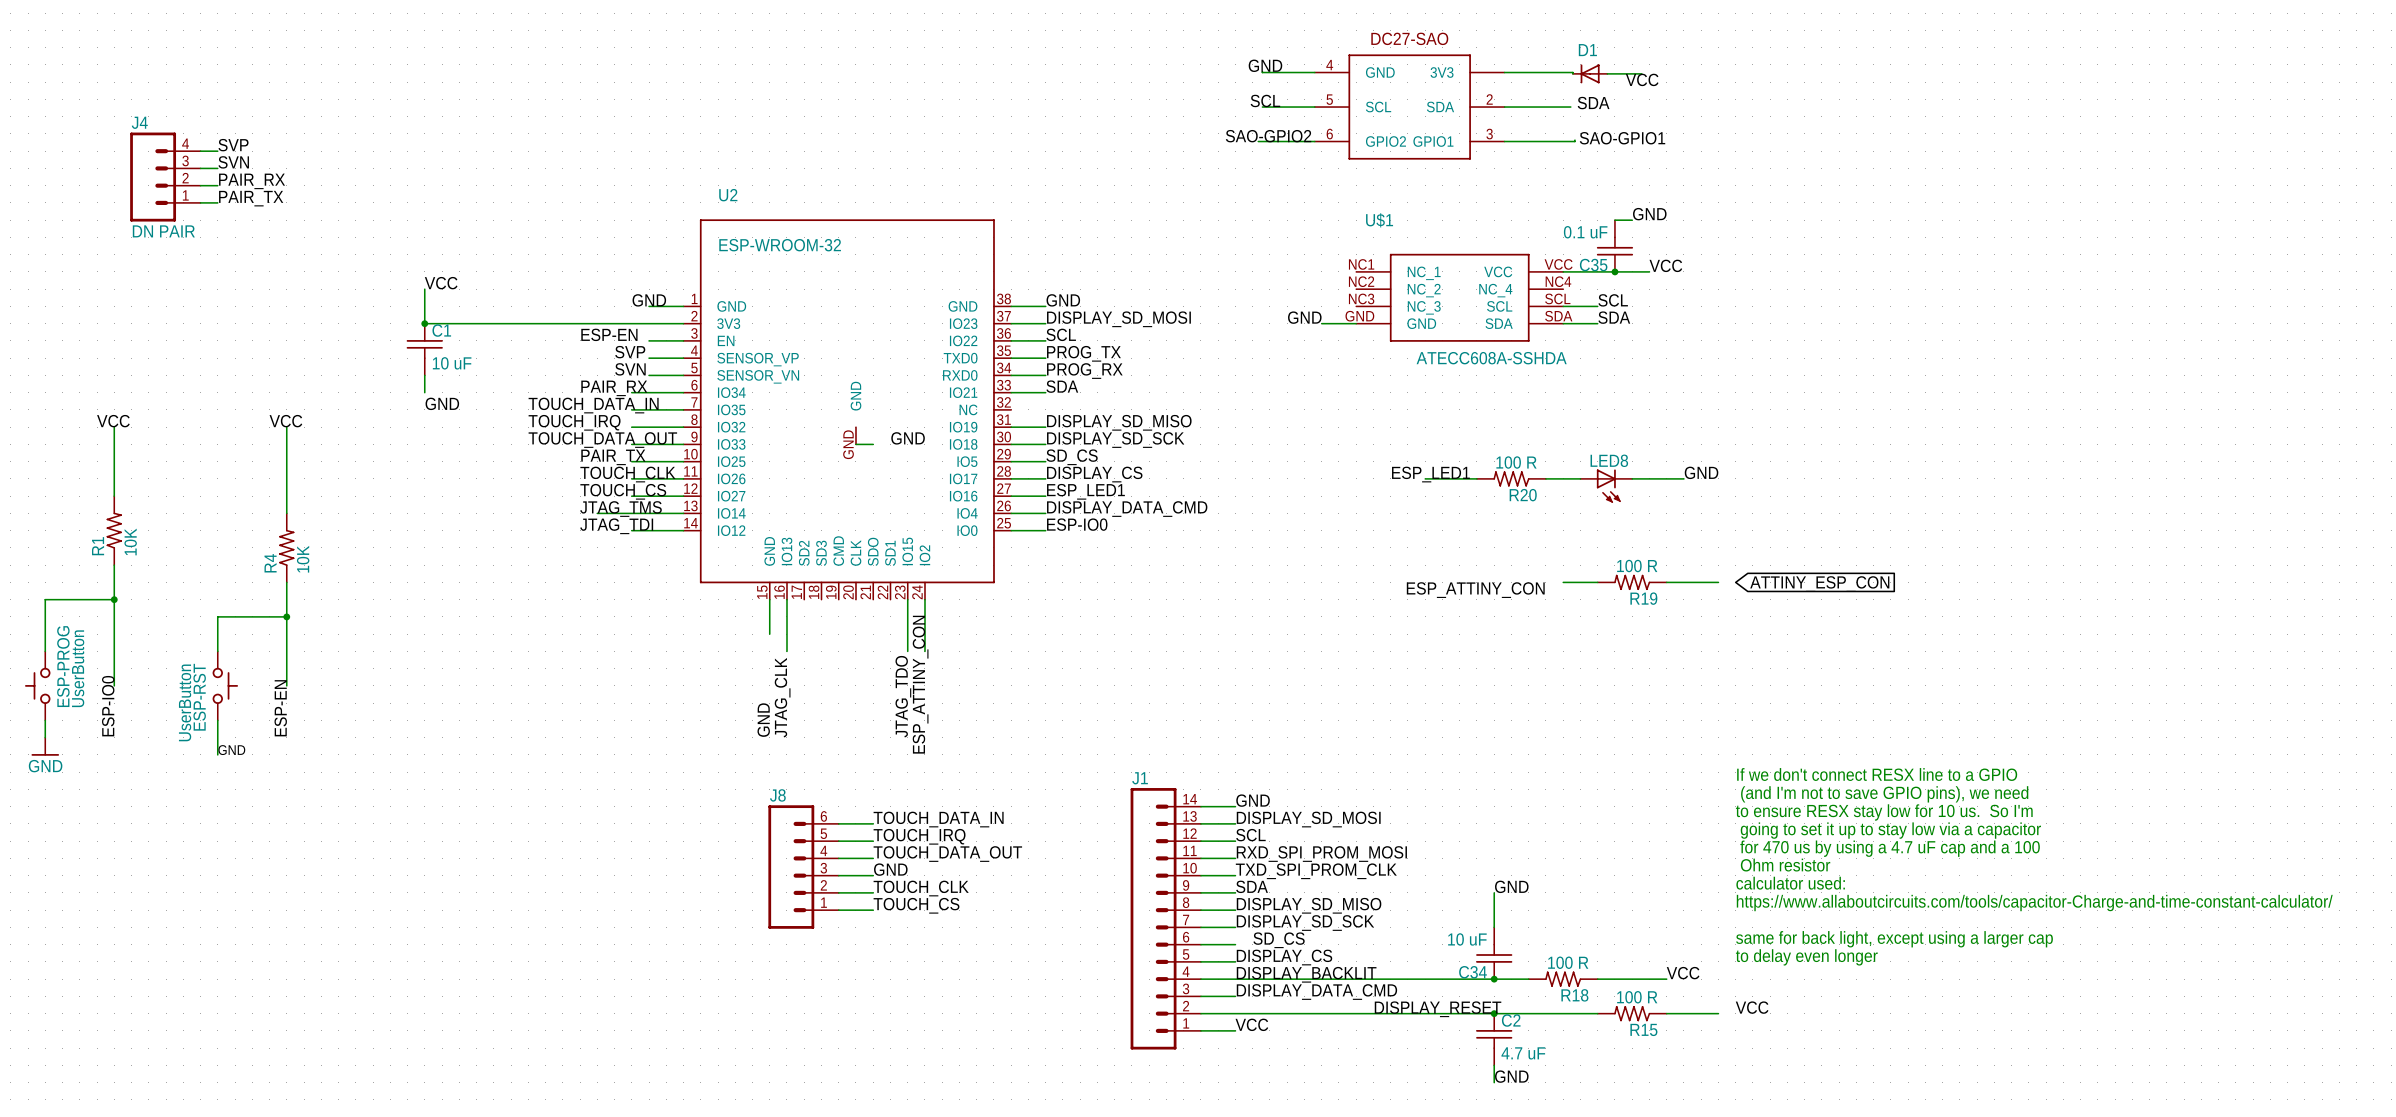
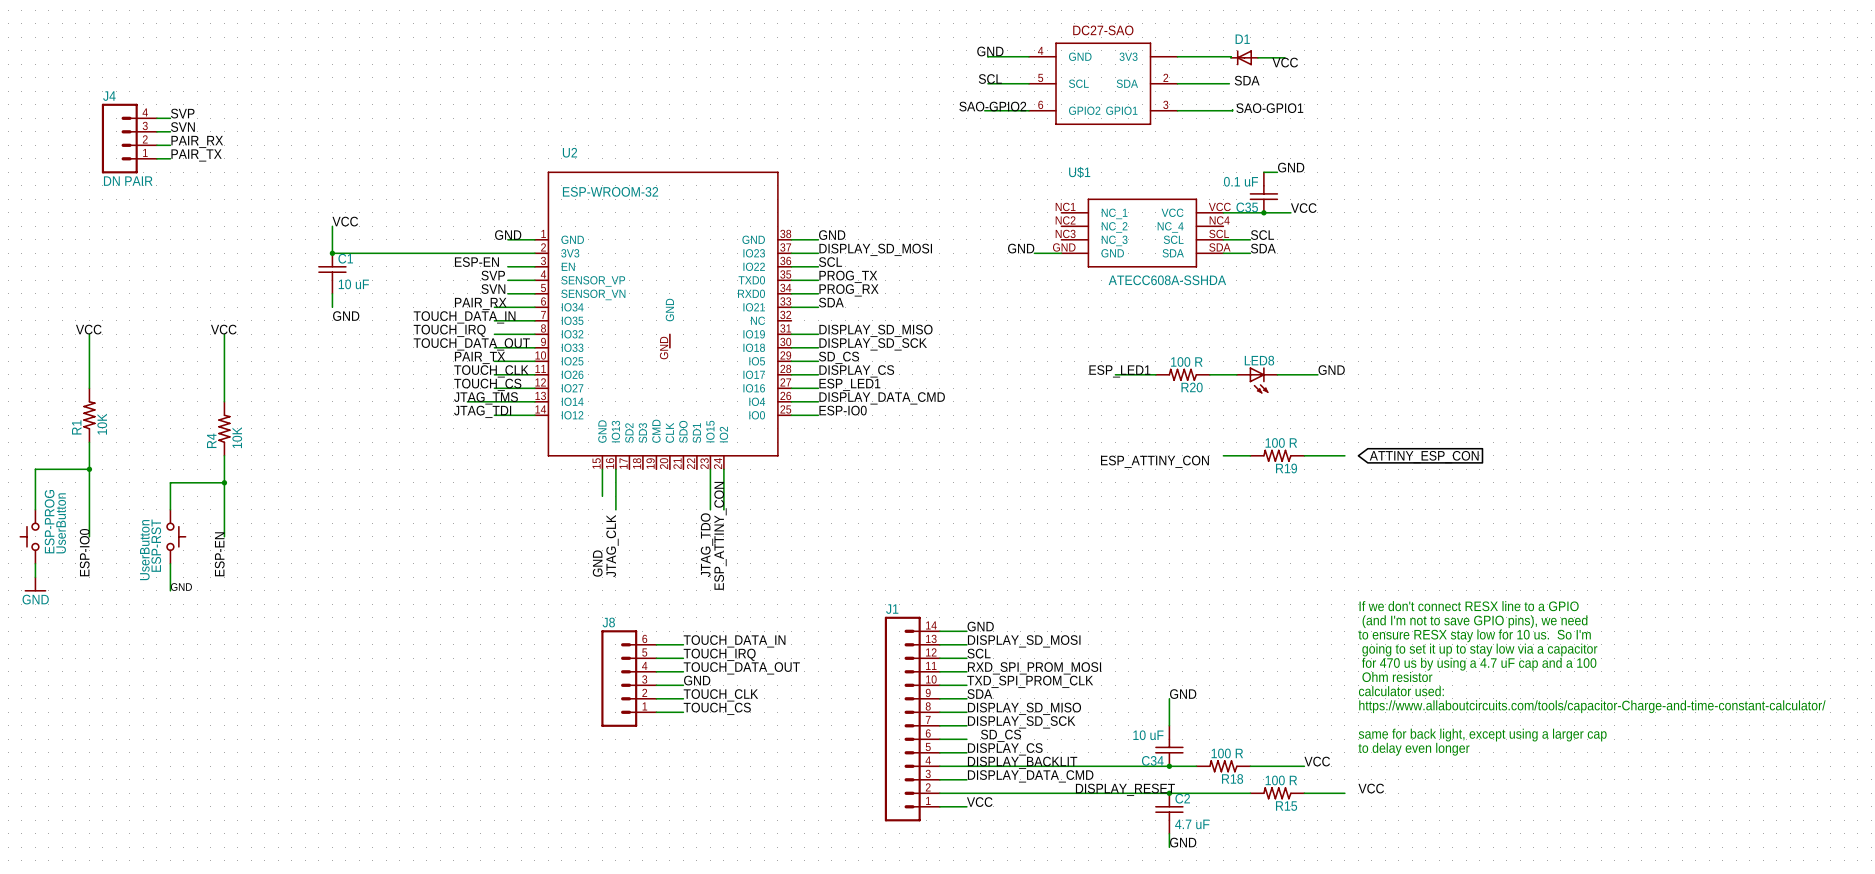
label: GND (908, 438) -> none
wire: (855, 444) (873, 444) -> none

